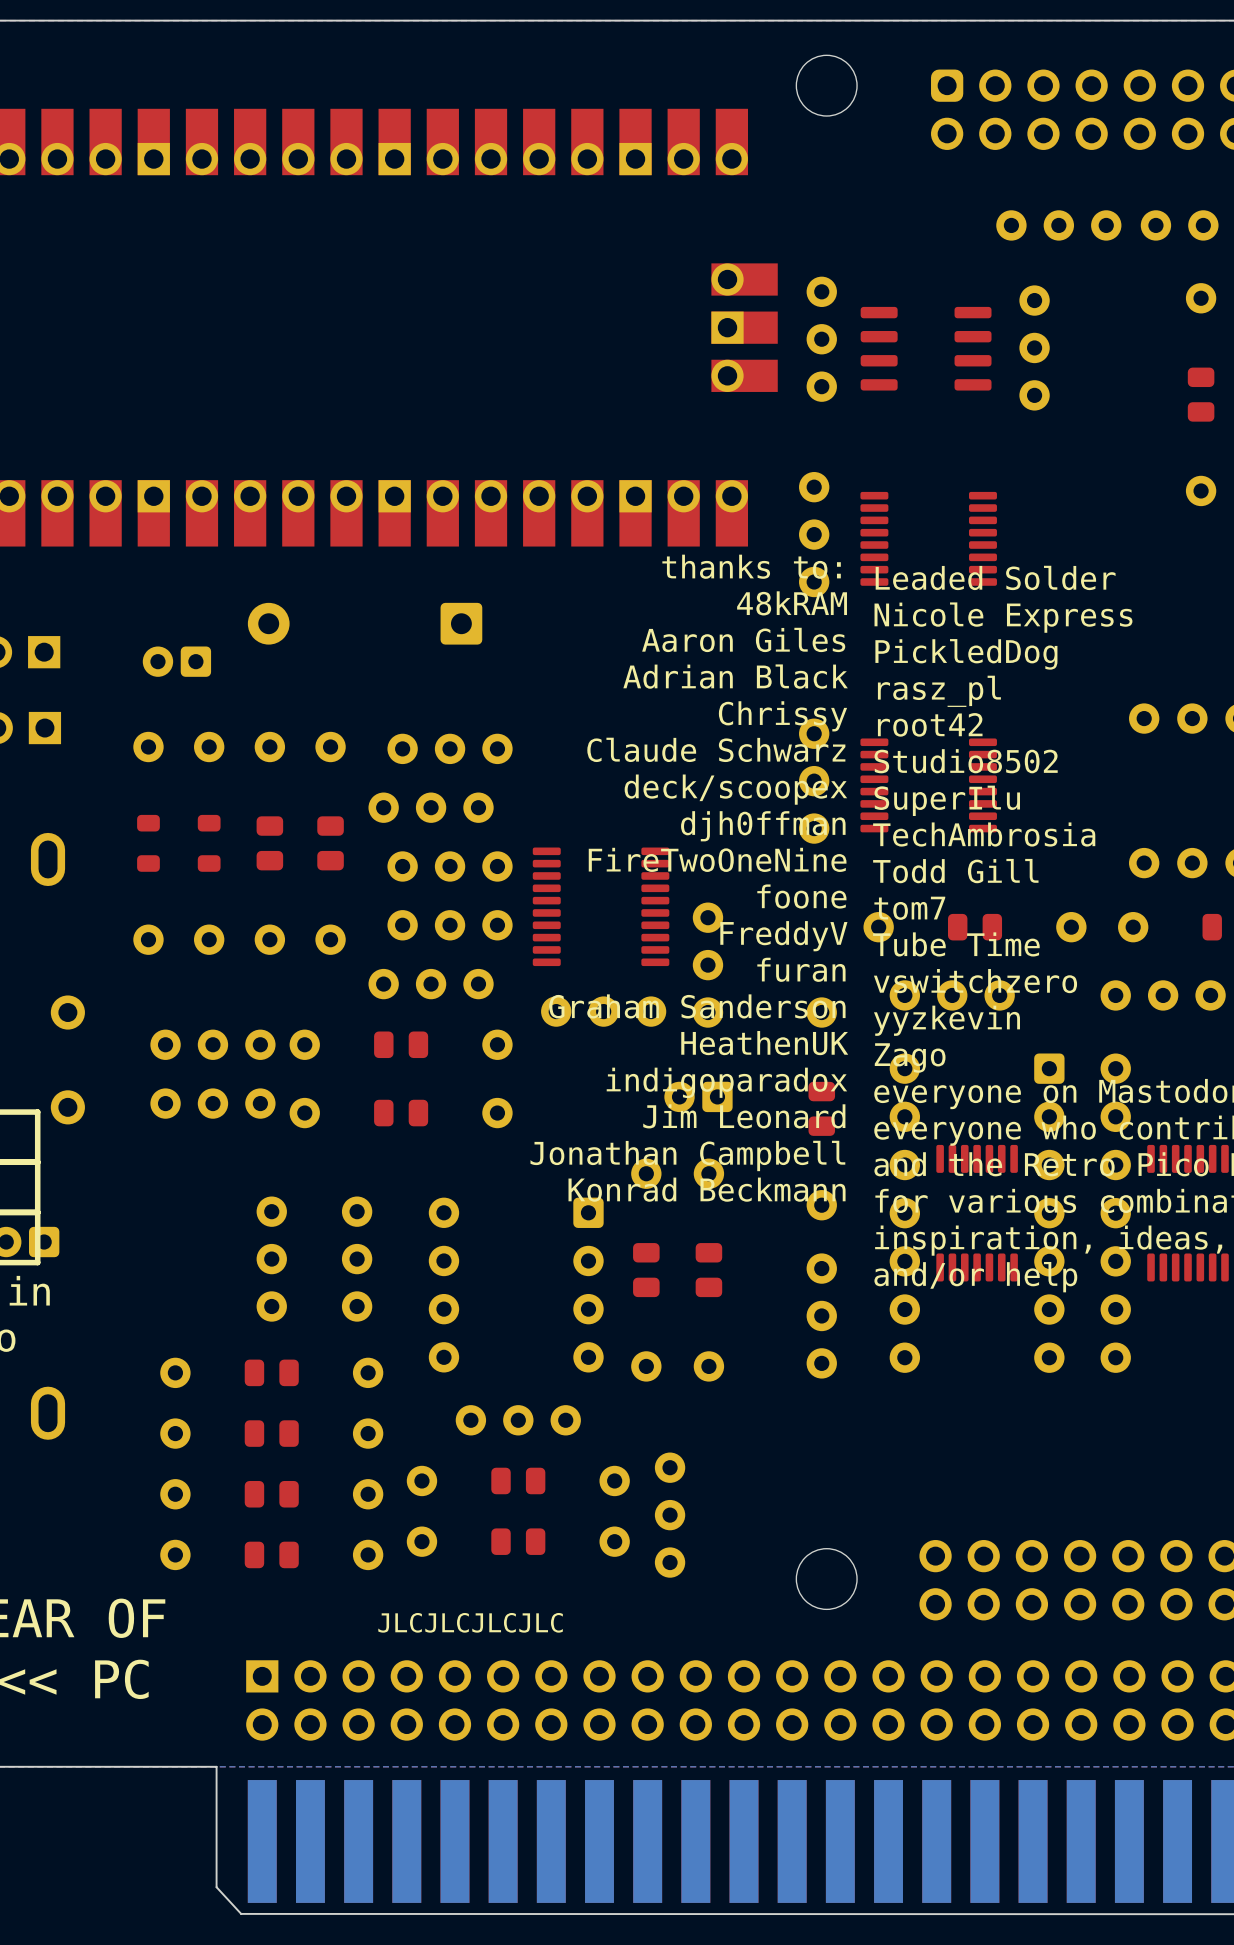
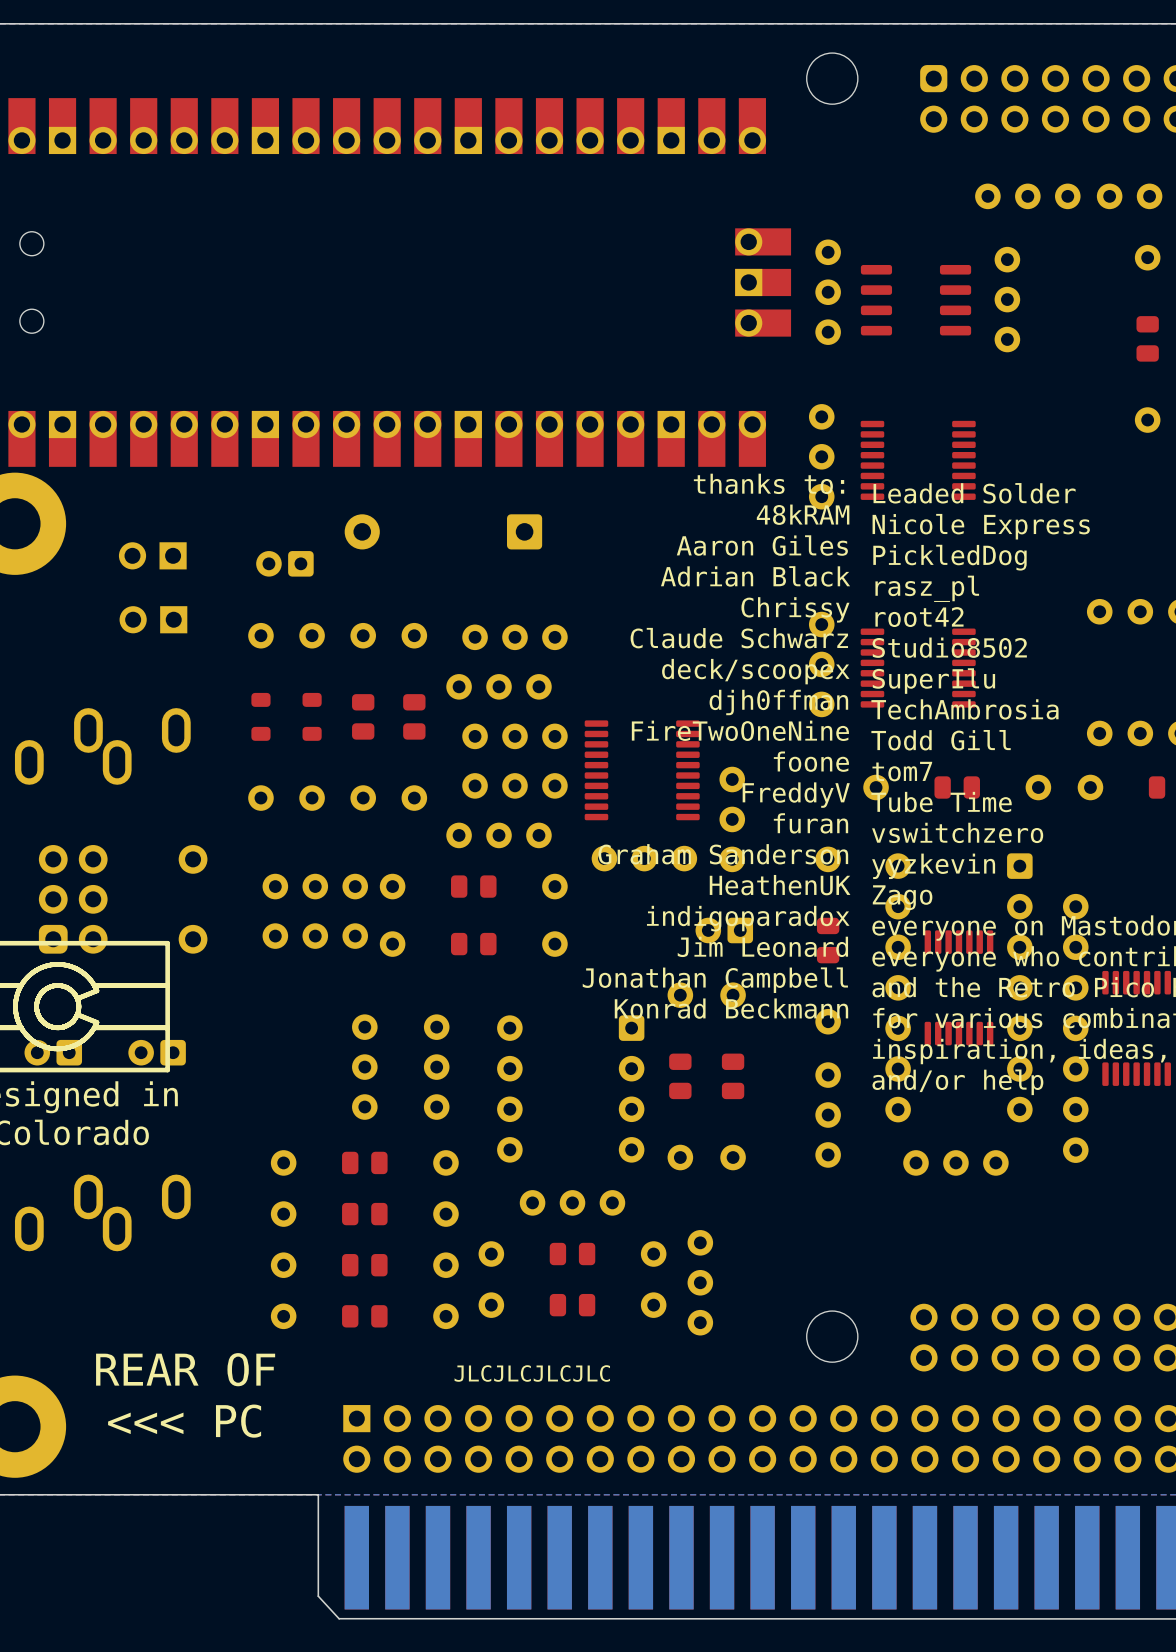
part: (952, 995) -> none
part: (1163, 995) -> none
part position: (977, 1213) -> (958, 987)
part: none -> (955, 1162)

